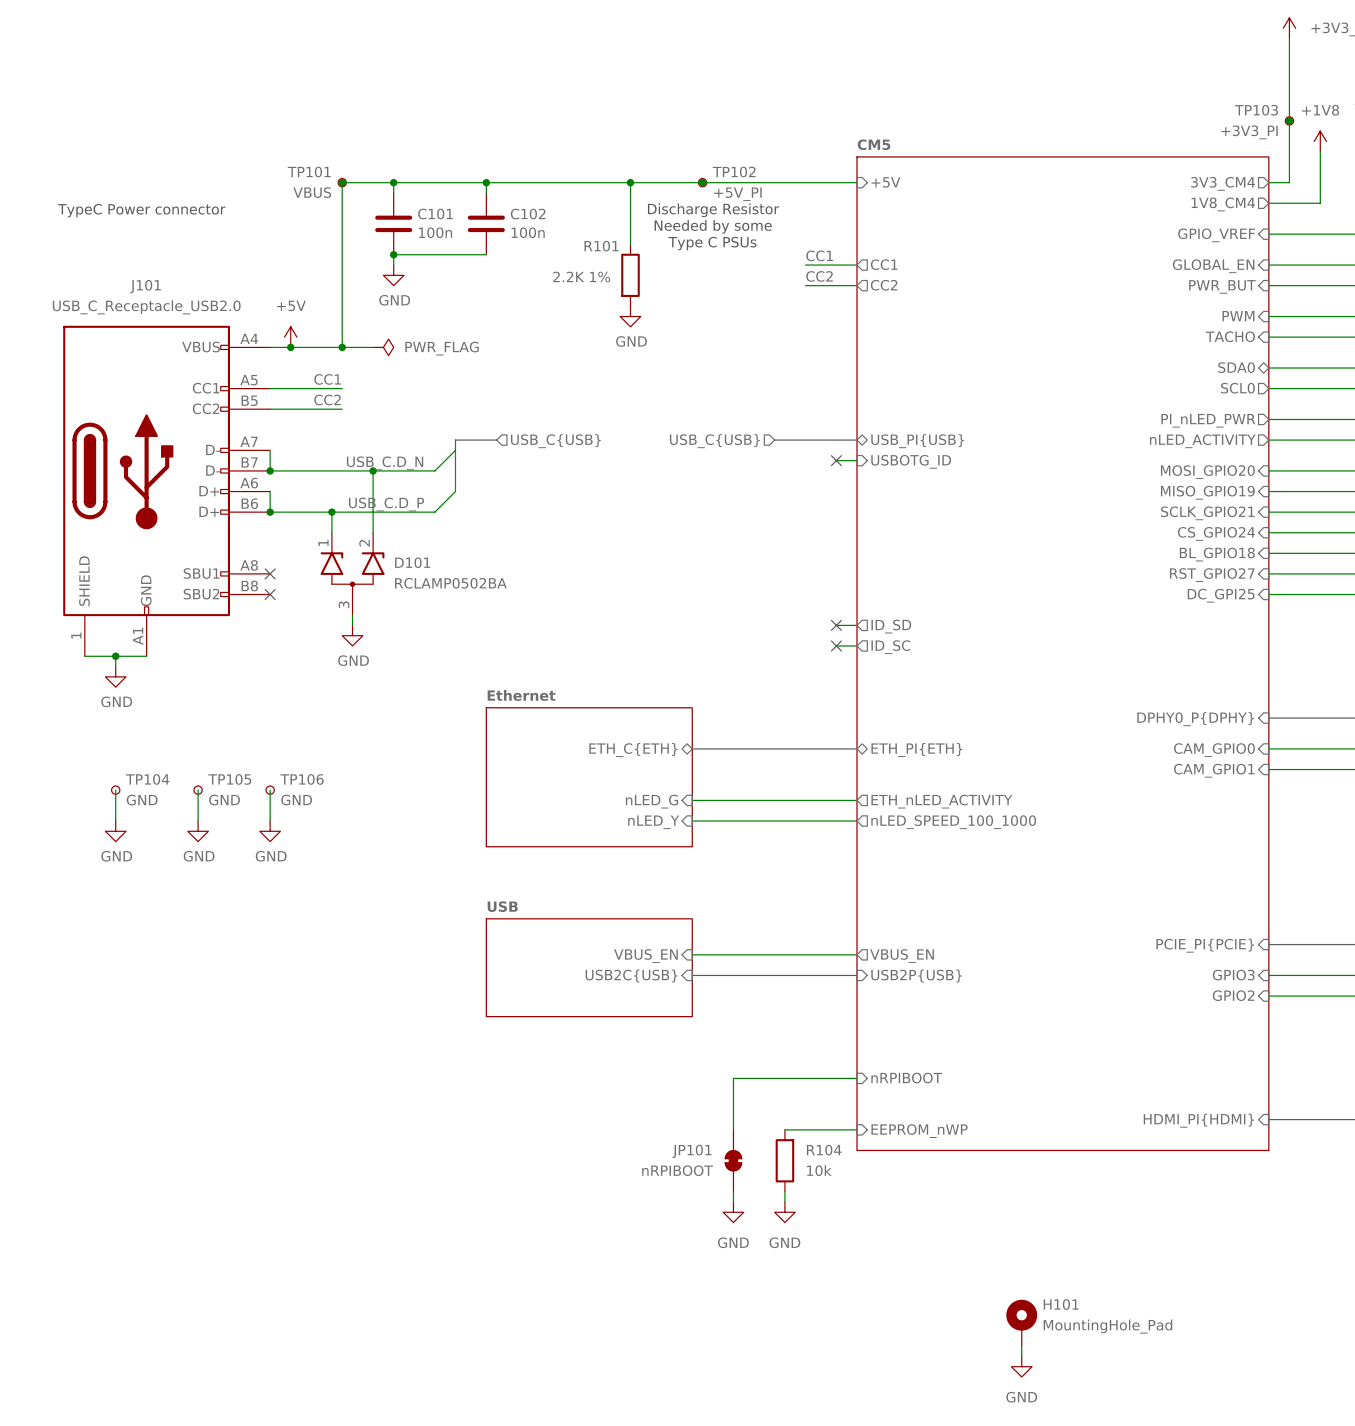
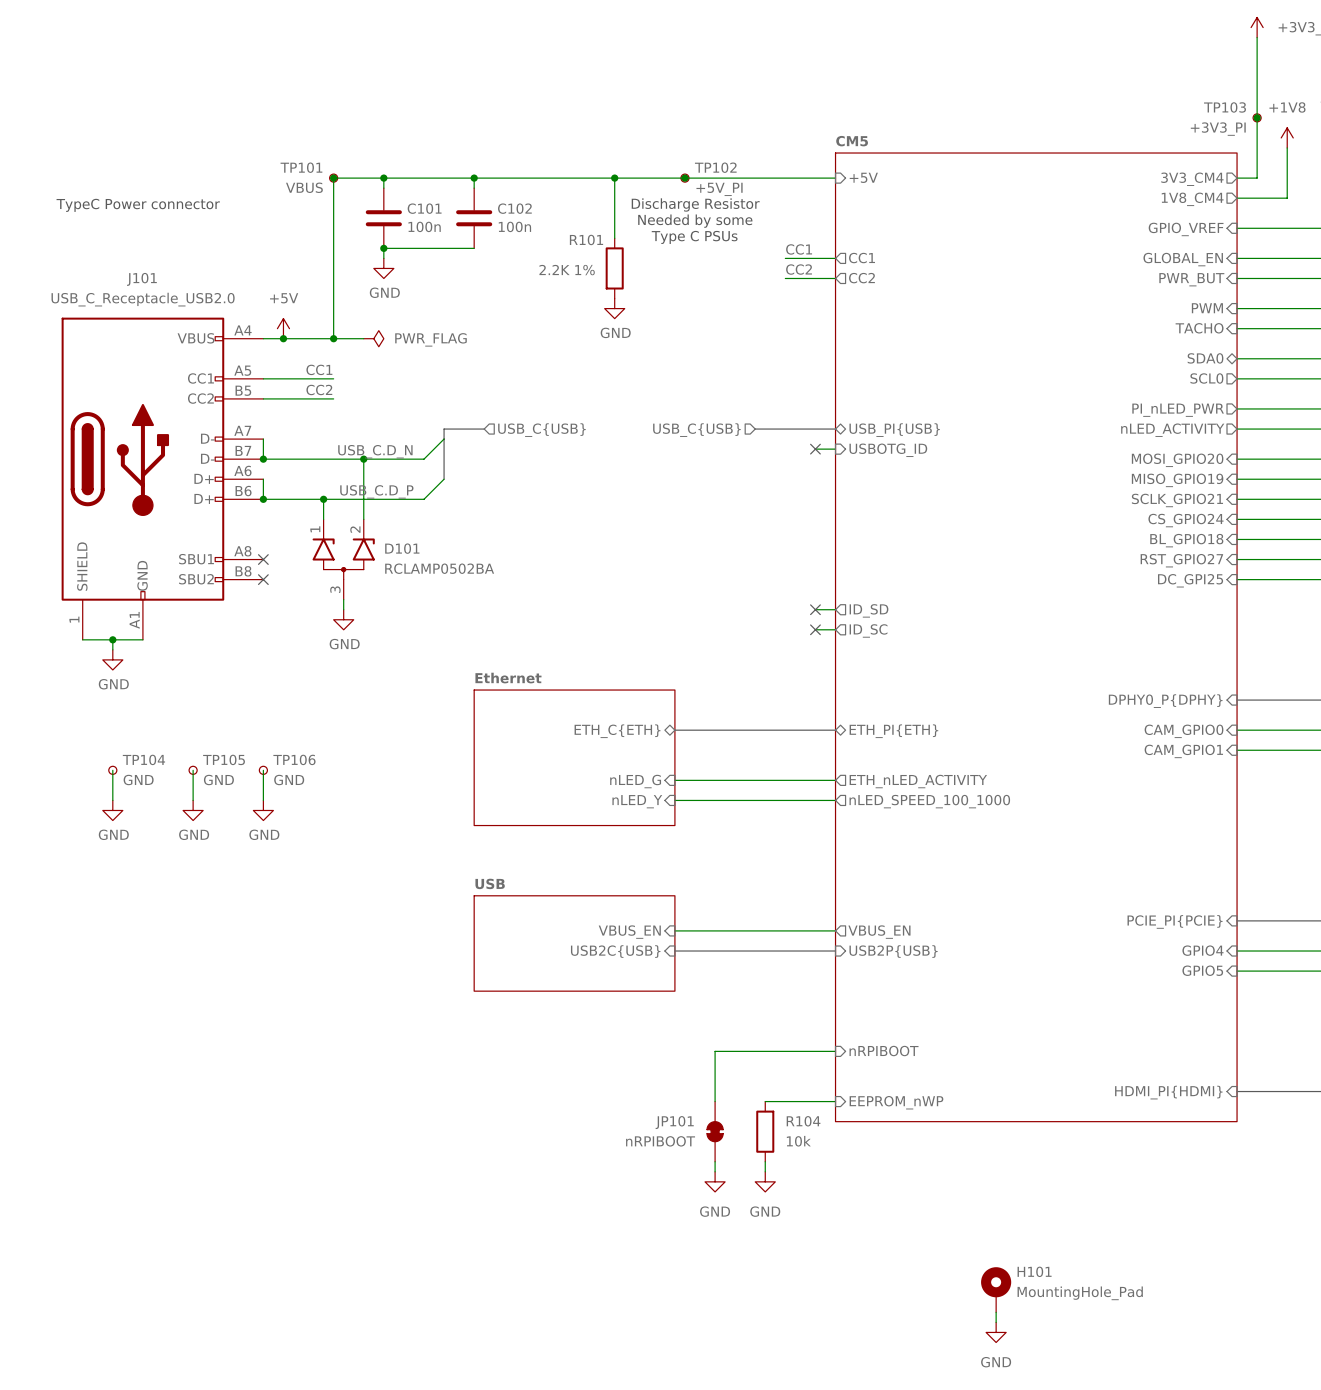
sheet pin: GPIO3 (1233, 975) -> GPIO4 (1202, 950)
sheet pin: GPIO2 (1233, 995) -> GPIO5 (1202, 970)

